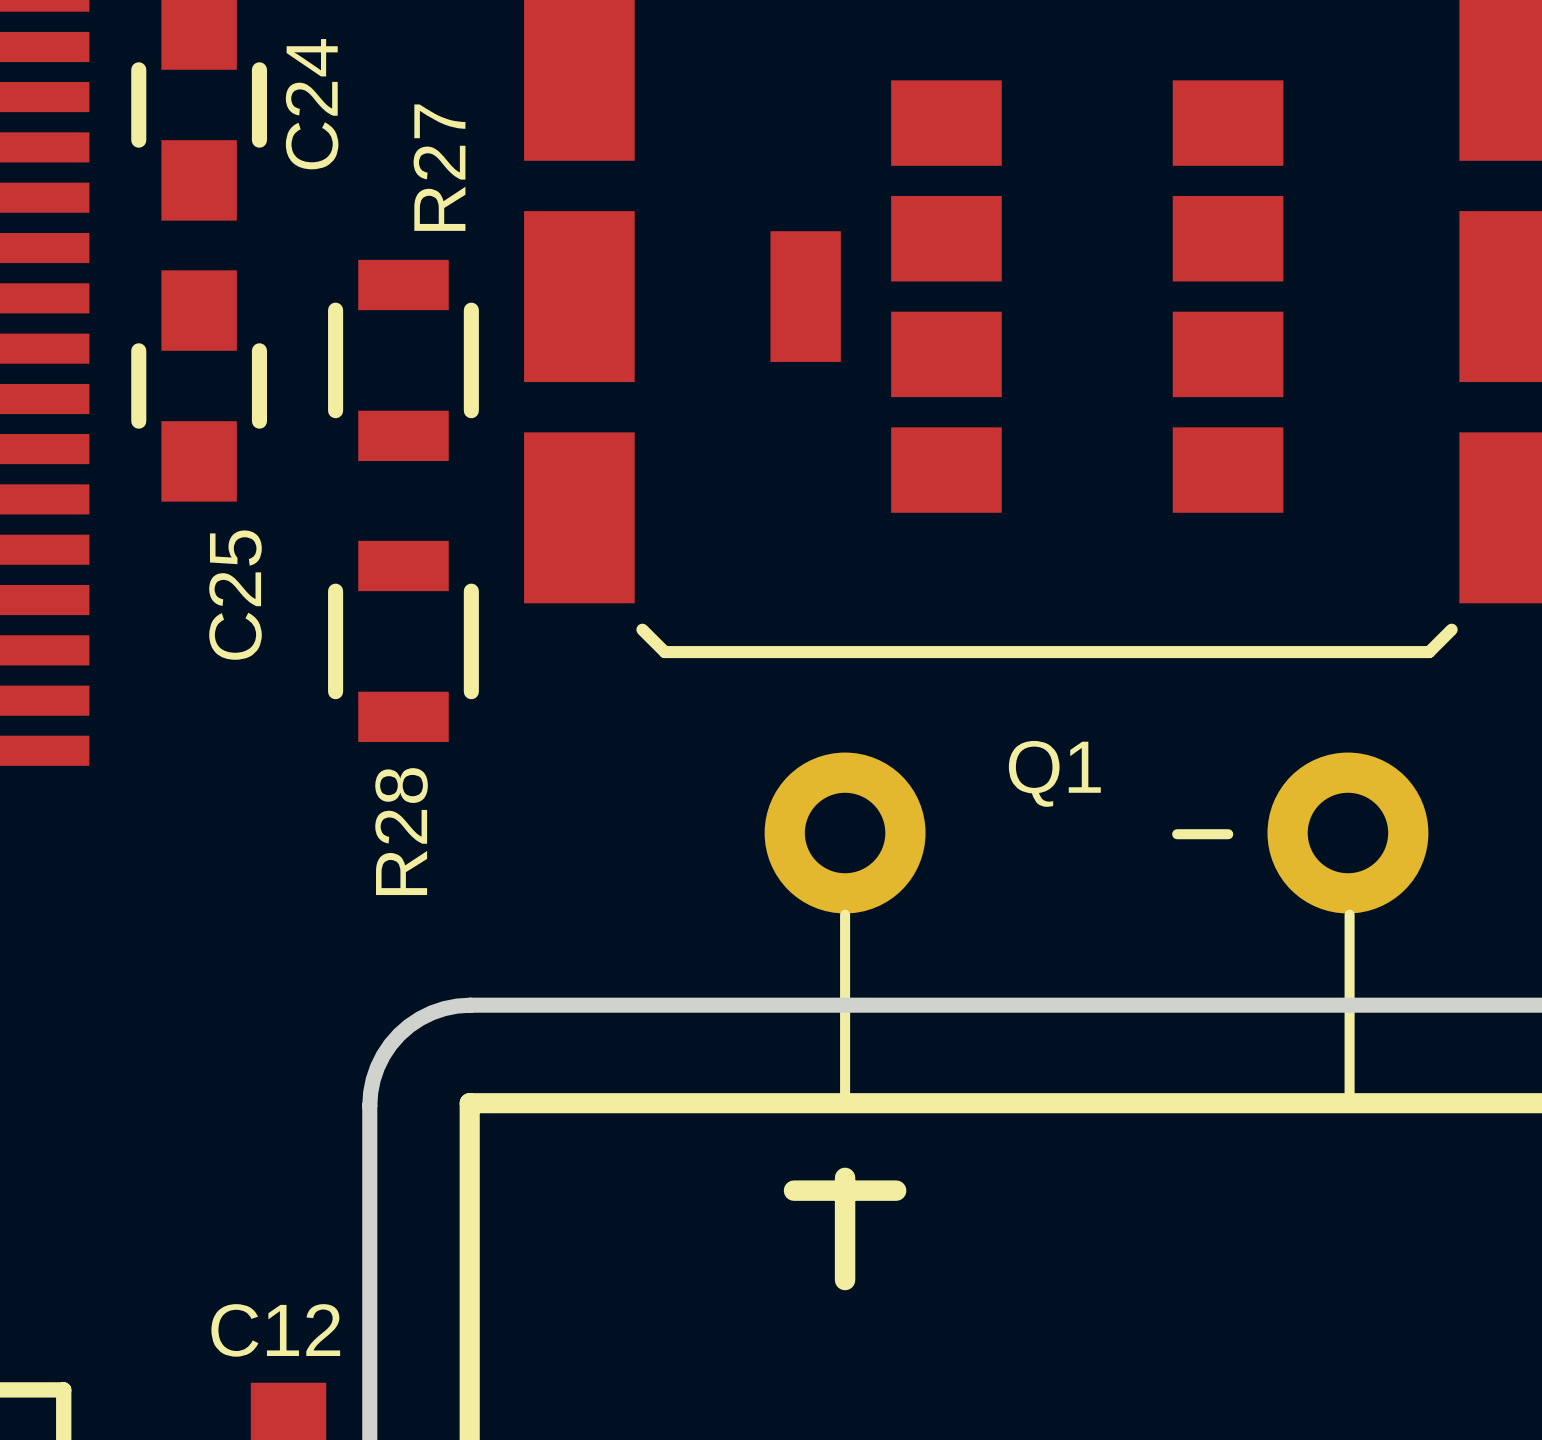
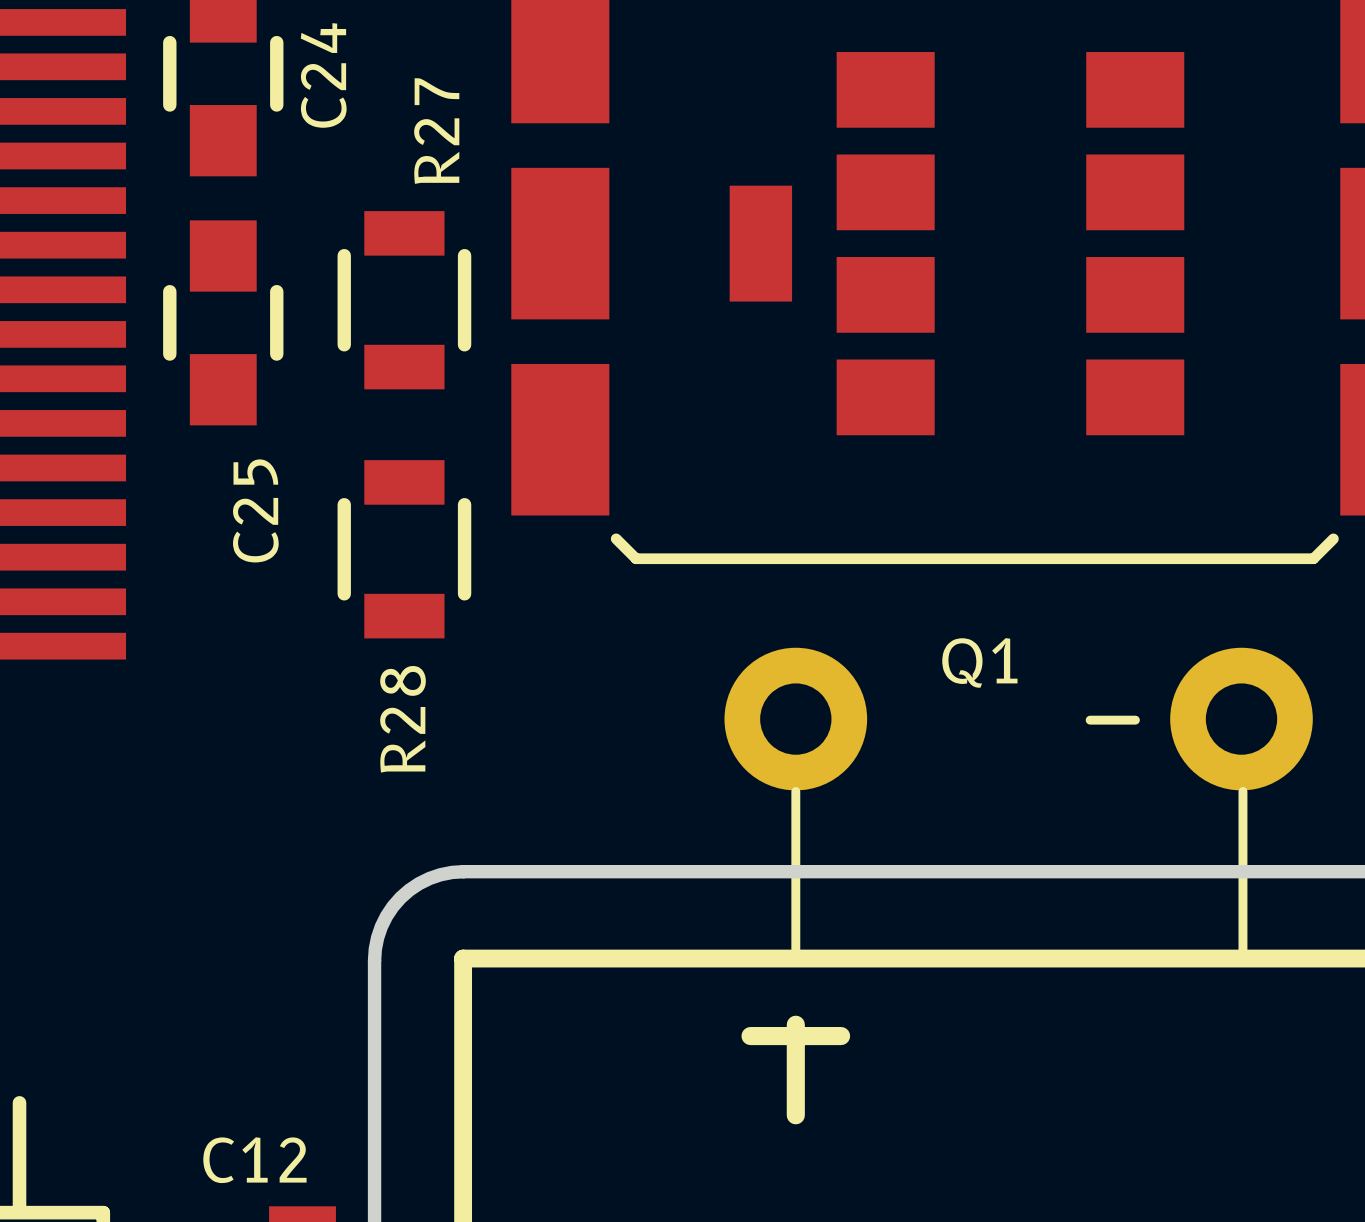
C12 name position: C12 (275, 1330) -> C12 (254, 1160)

